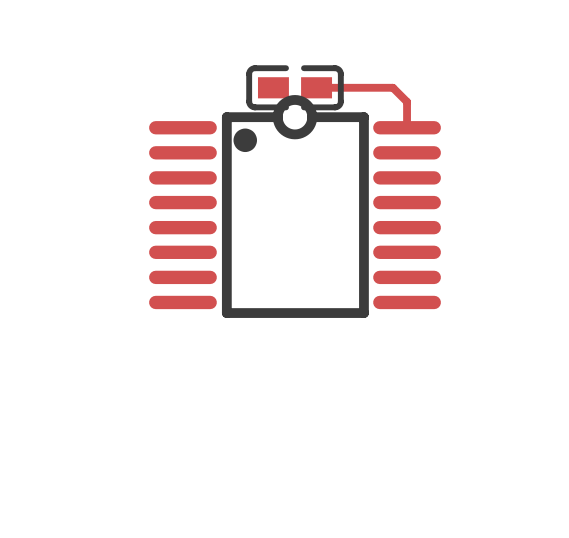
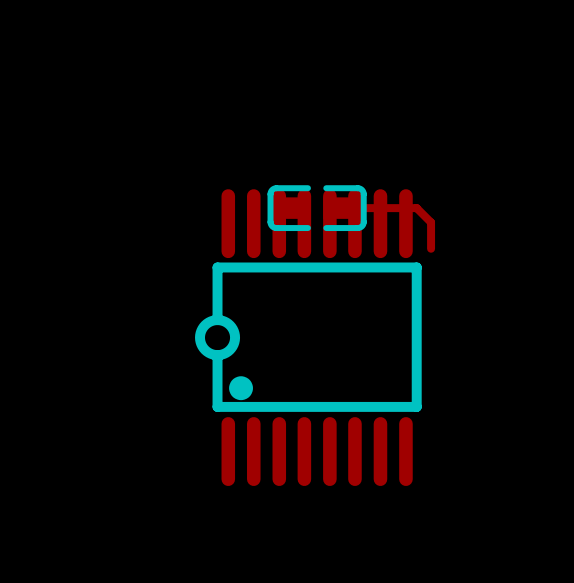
part rotation: 0° (295, 206) -> 90° counterclockwise (308, 337)

